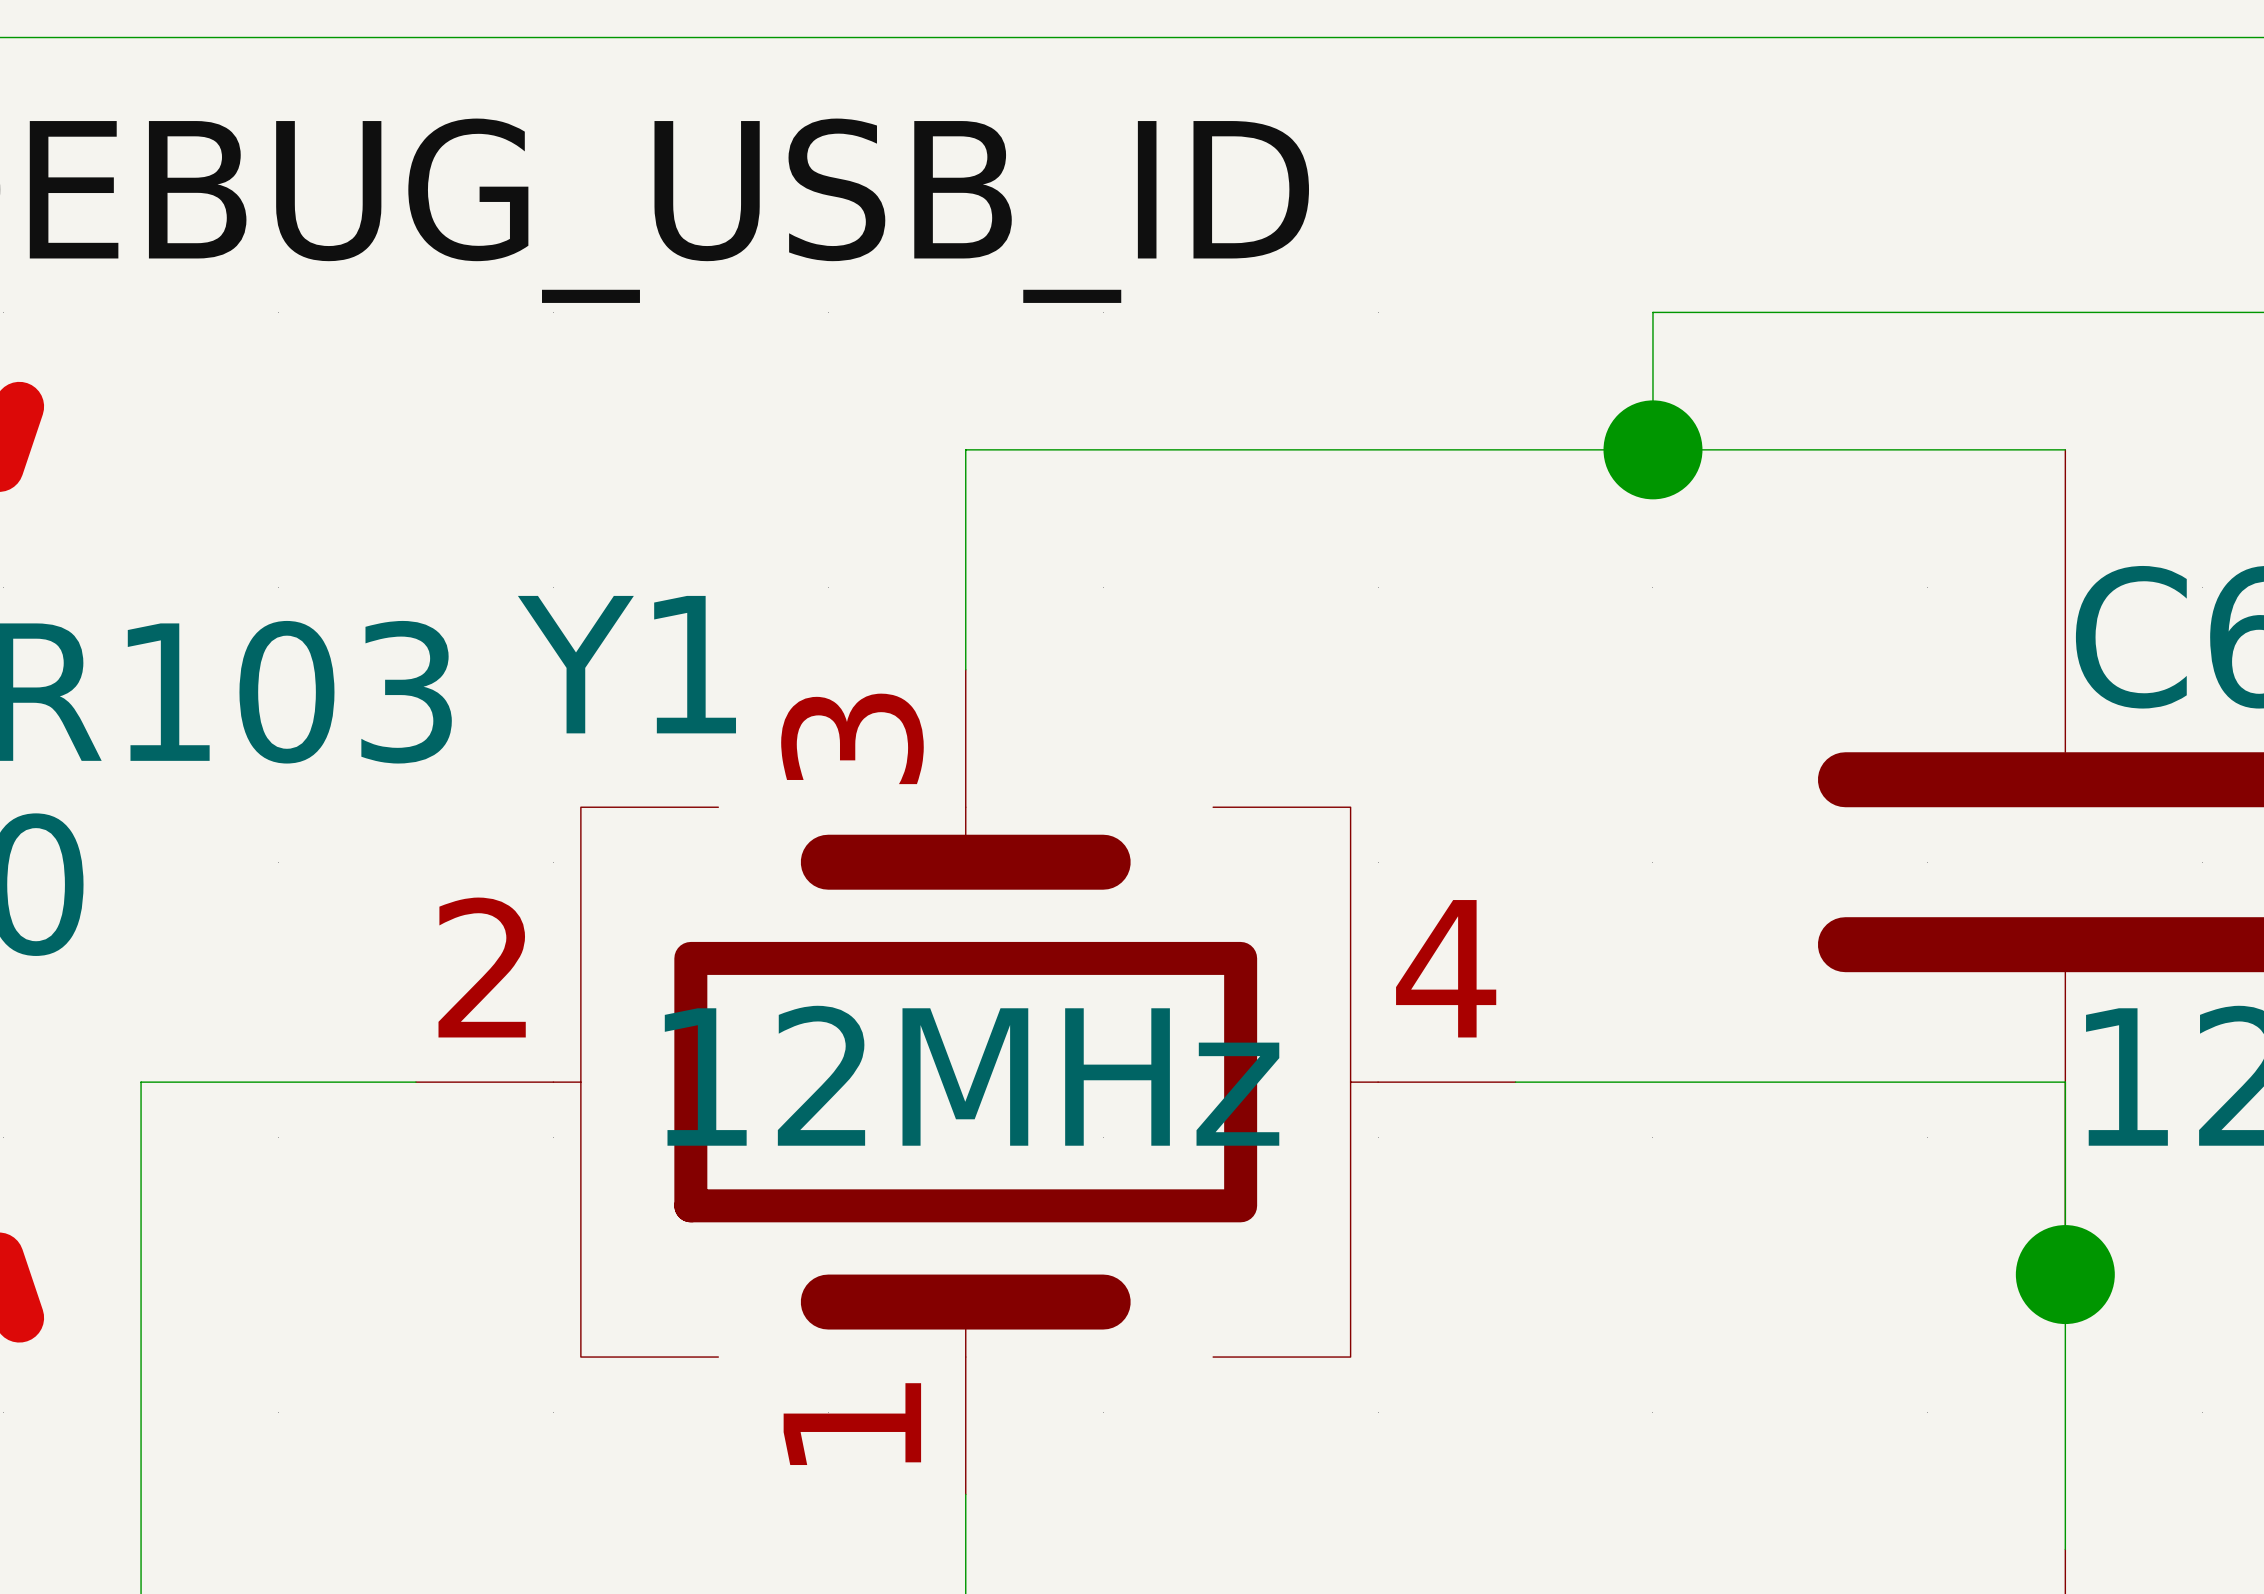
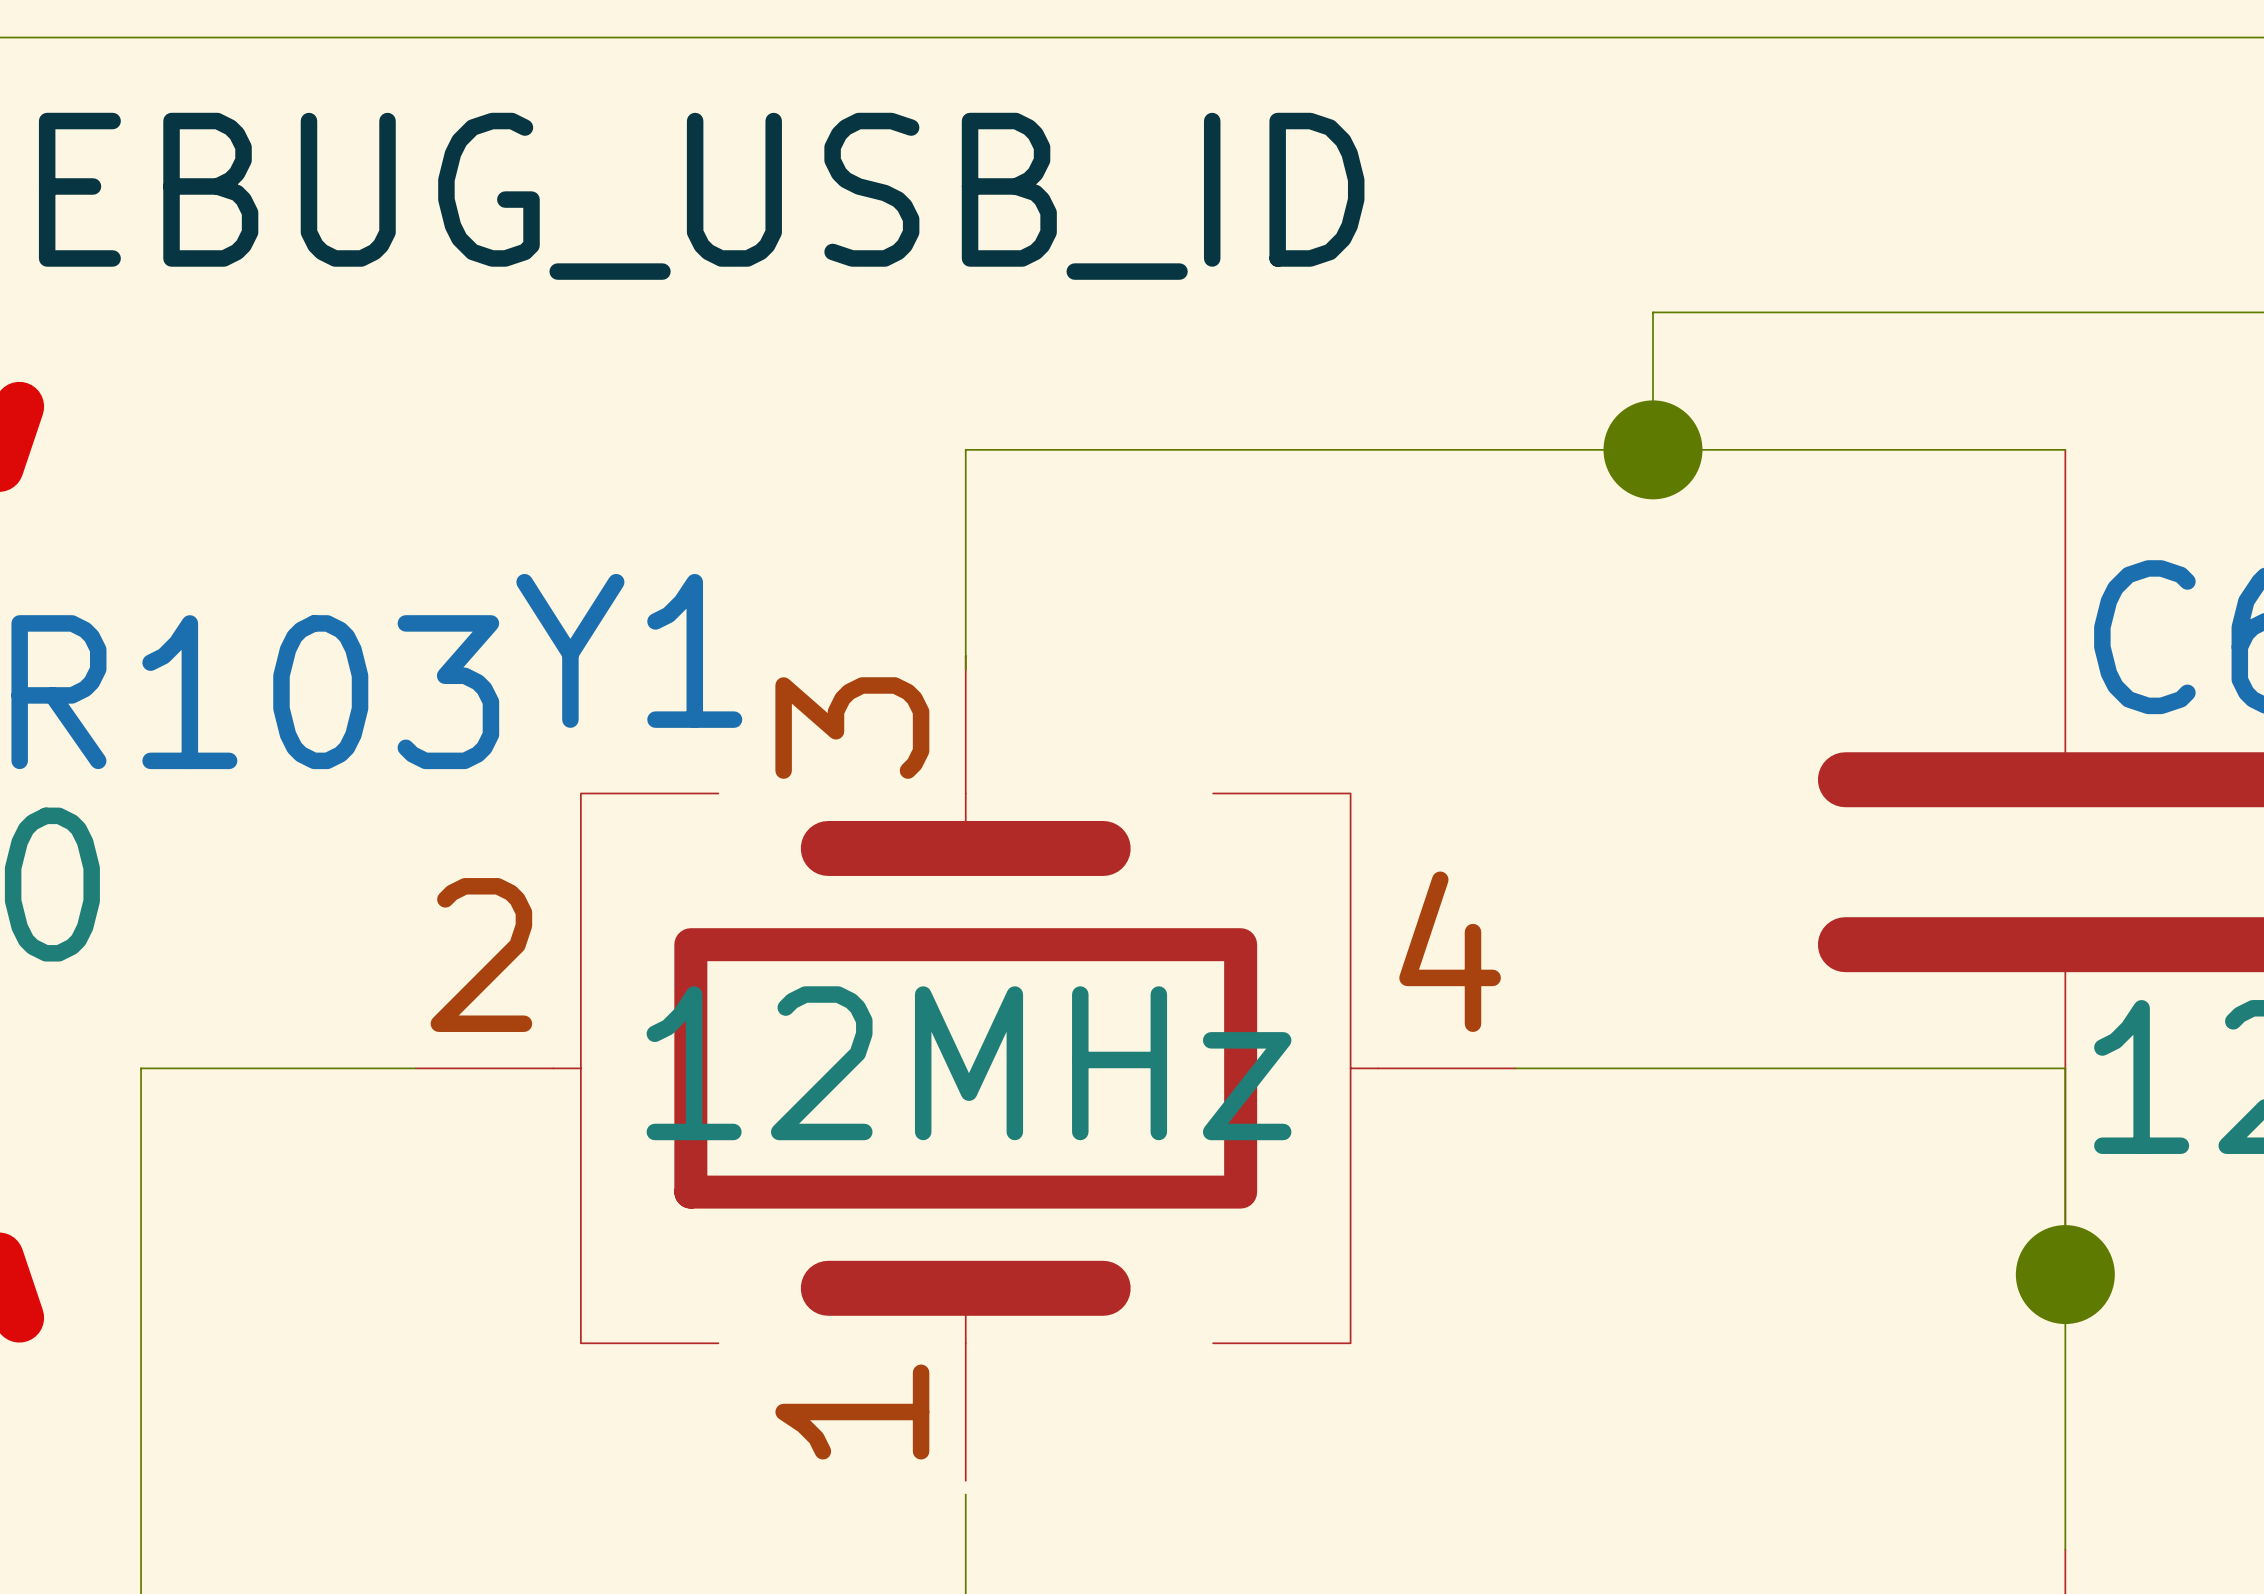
wire: (141, 1082) (415, 1082) -> (141, 1082) (141, 1068) (415, 1068)
Y1 position: (965, 1082) -> (965, 1068)
wire: (1515, 1082) (2065, 1082) -> (1515, 1068) (2065, 1068) (2065, 1082)

